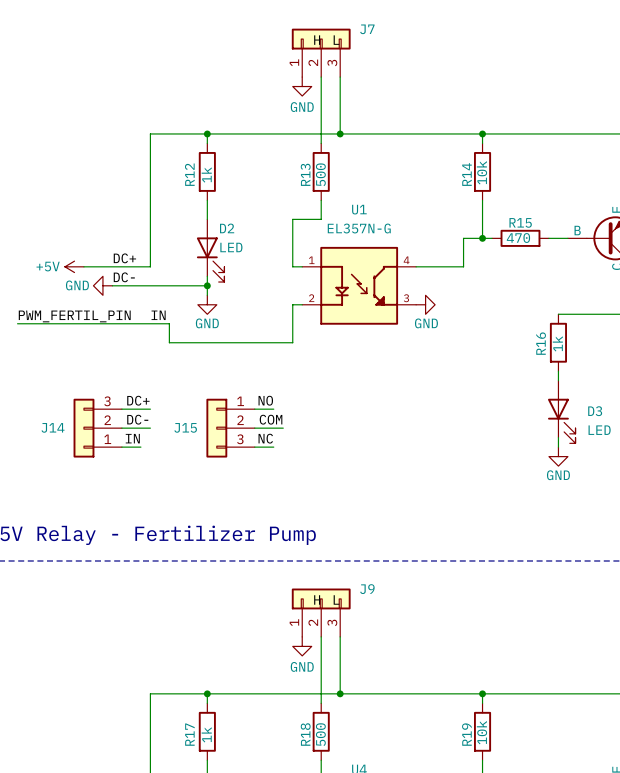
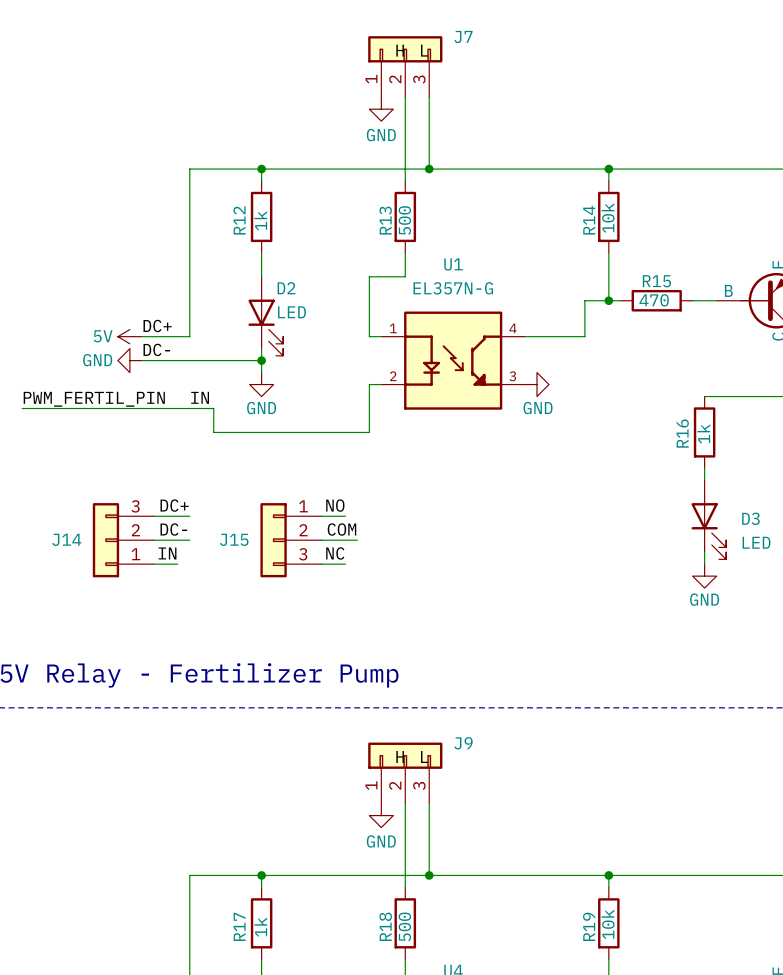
power symbol: +5V (74, 266) -> none
power symbol: none -> 5V (129, 336)

